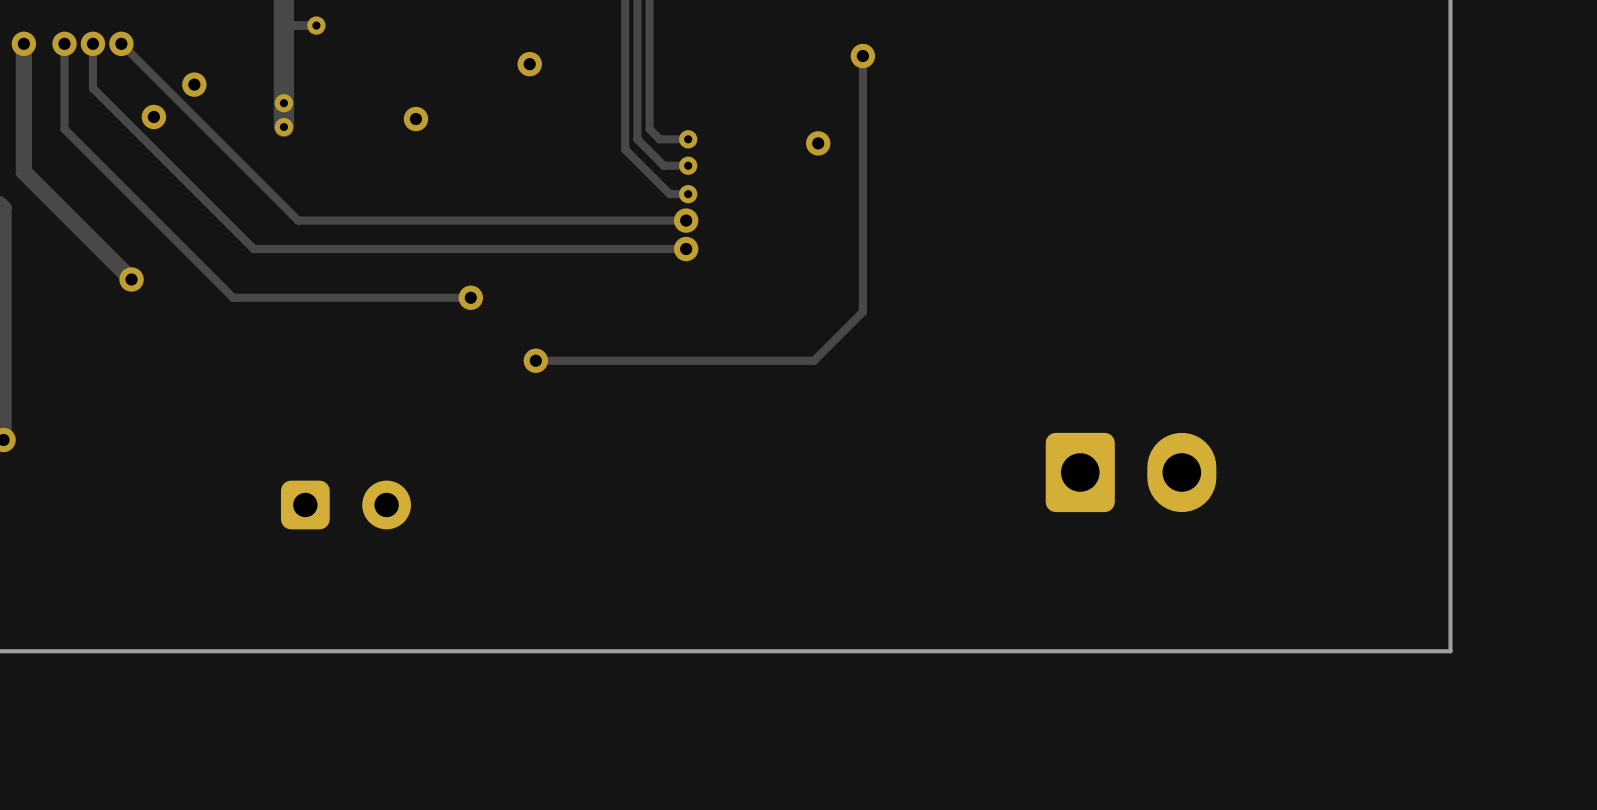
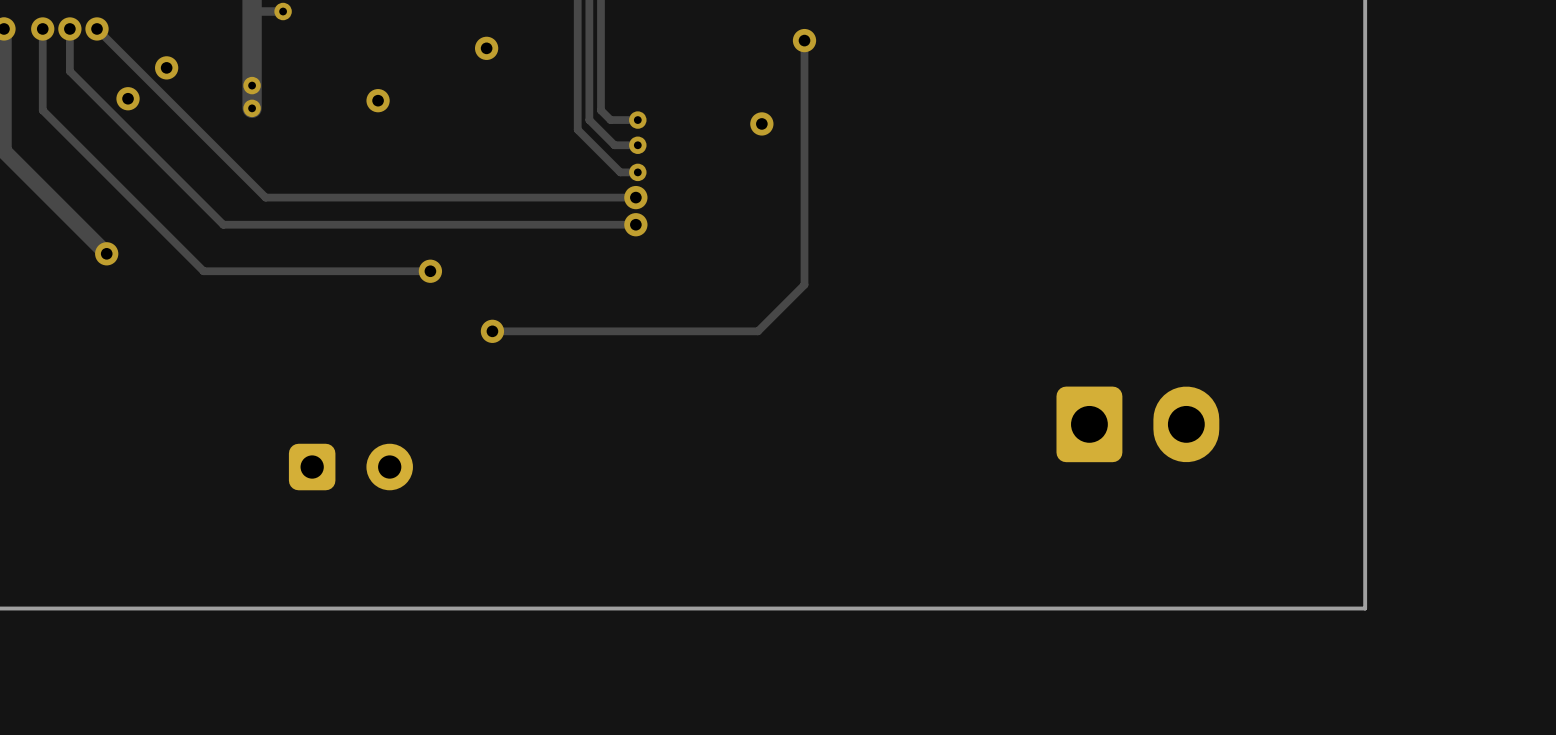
part position: (1131, 472) -> (1137, 424)
part position: (345, 504) -> (350, 467)

